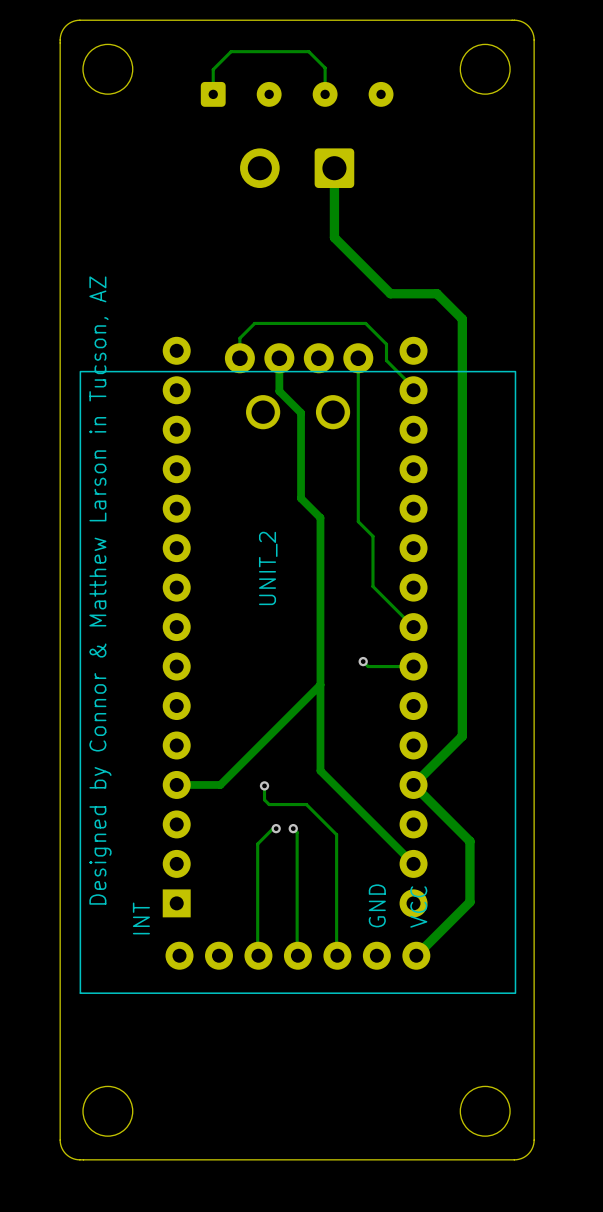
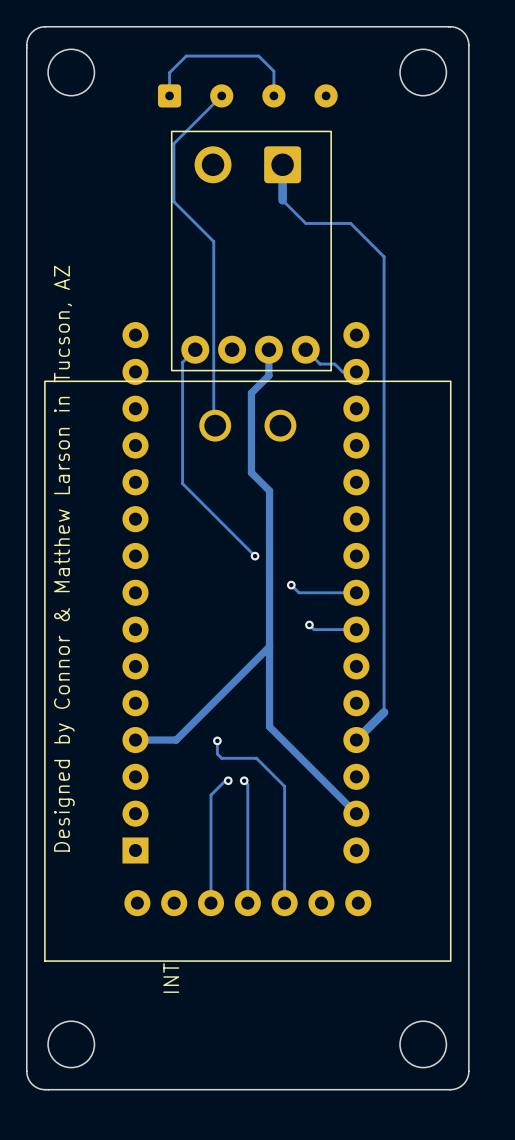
track: none -> (221, 95) (173, 143) (173, 201) (213, 241) (215, 425)
track: (334, 206) (334, 237) (390, 293) (437, 293) (462, 319) (462, 736) (443, 755) -> (282, 200) (305, 223) (350, 223) (384, 256) (384, 712)
track: (239, 358) (239, 338) (254, 323) (365, 323) (386, 344) (386, 360) (413, 387) (413, 390) -> (305, 349) (320, 364) (334, 364) (342, 371) (356, 371)
track: (279, 358) (279, 391) (301, 412) -> (268, 349) (268, 375) (251, 393)
part side: top (299, 358) -> bottom (251, 251)
track: (358, 358) (358, 521) (372, 536) (372, 586) (413, 627) -> (291, 585) (298, 592) (356, 592)
track: none -> (195, 349) (182, 362) (182, 483) (255, 556)
via: none -> (255, 556)
via: none -> (291, 585)
UNIT_2: (297, 682) -> none
part: none -> (247, 671)
track: (413, 784) (469, 841) (469, 902) (416, 955) -> none

